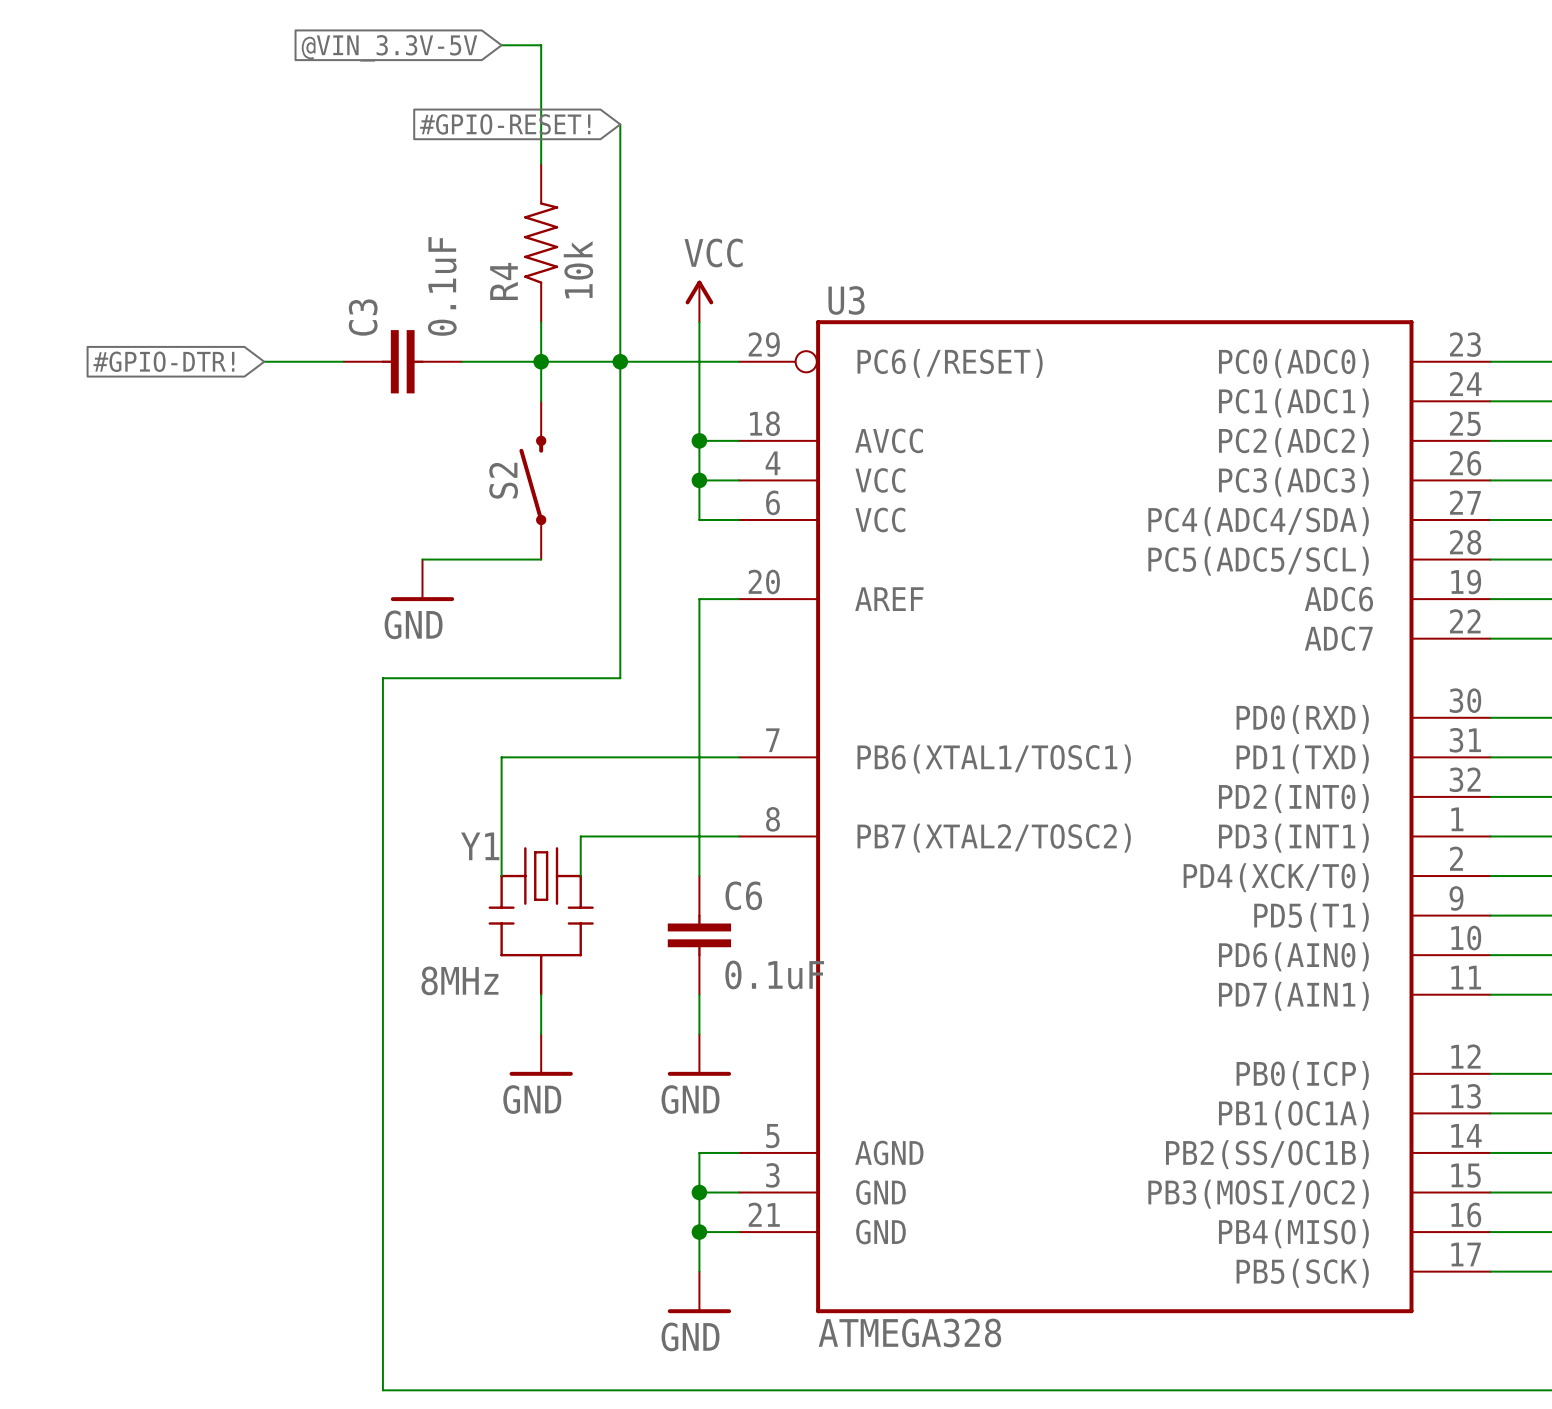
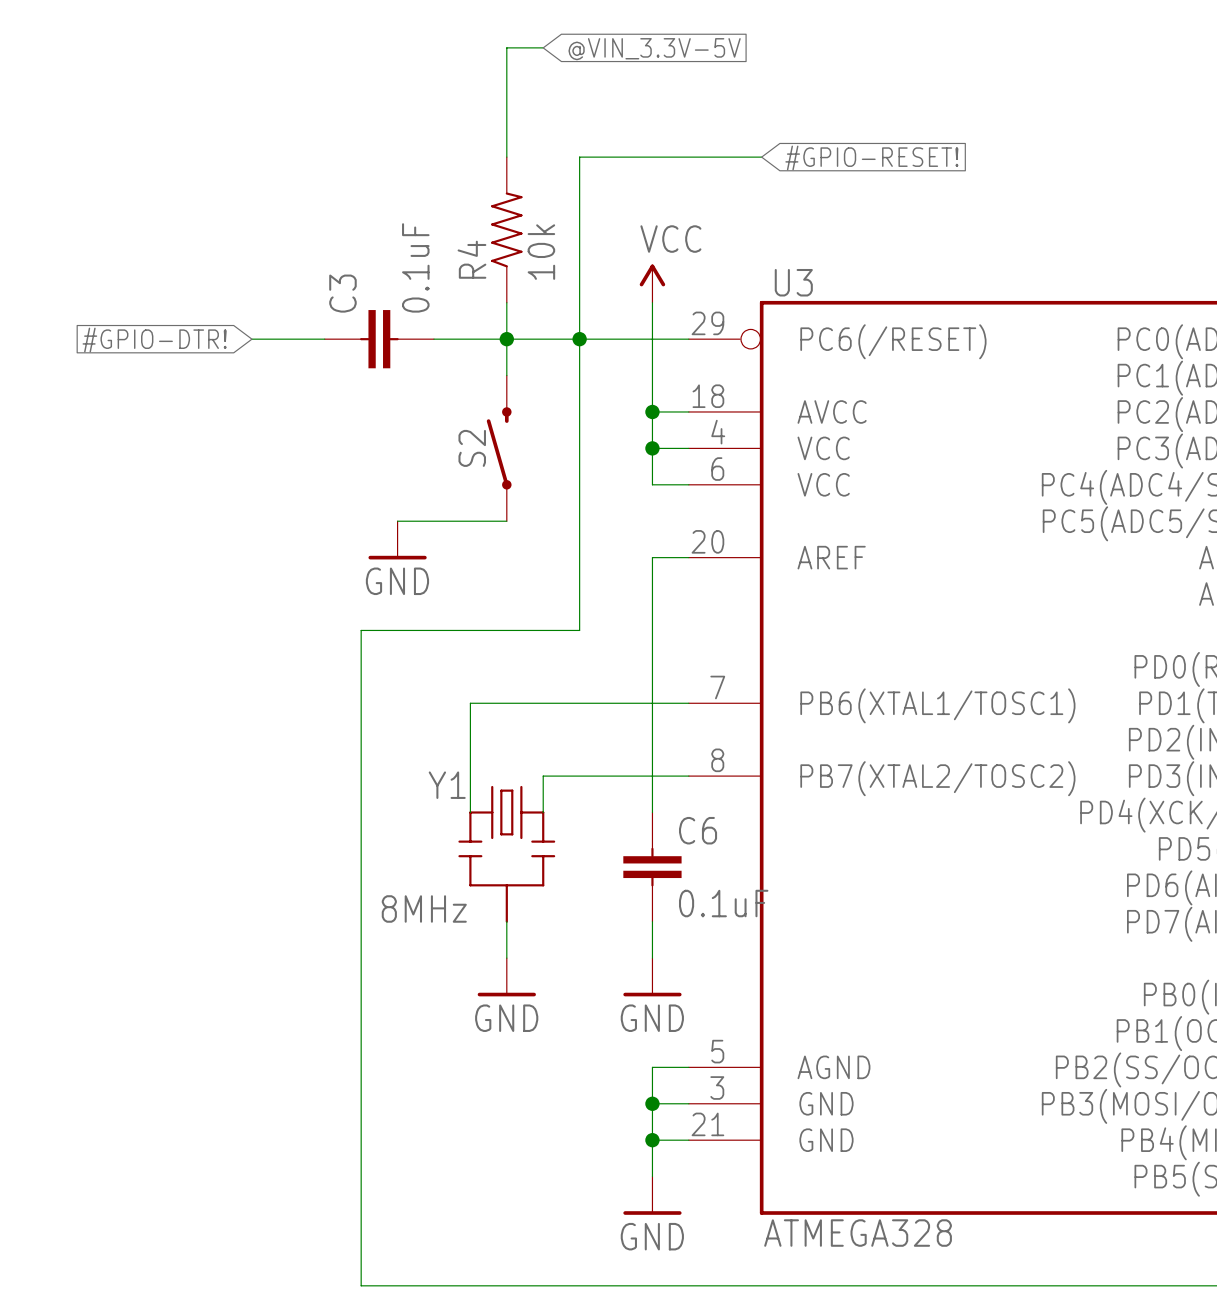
wire: (501, 45) (541, 45) -> (543, 47) (506, 47)
global label rotation: 0° (389, 48) -> 180° (654, 49)
global label position: @VIN_3.3V-5V (389, 48) -> @VIN_3.3V-5V (654, 49)
global label rotation: 0° (505, 124) -> 180° (871, 157)
global label position: #GPIO-RESET! (505, 124) -> #GPIO-RESET! (871, 157)
wire: (620, 124) (620, 163) -> (761, 157) (579, 157)

